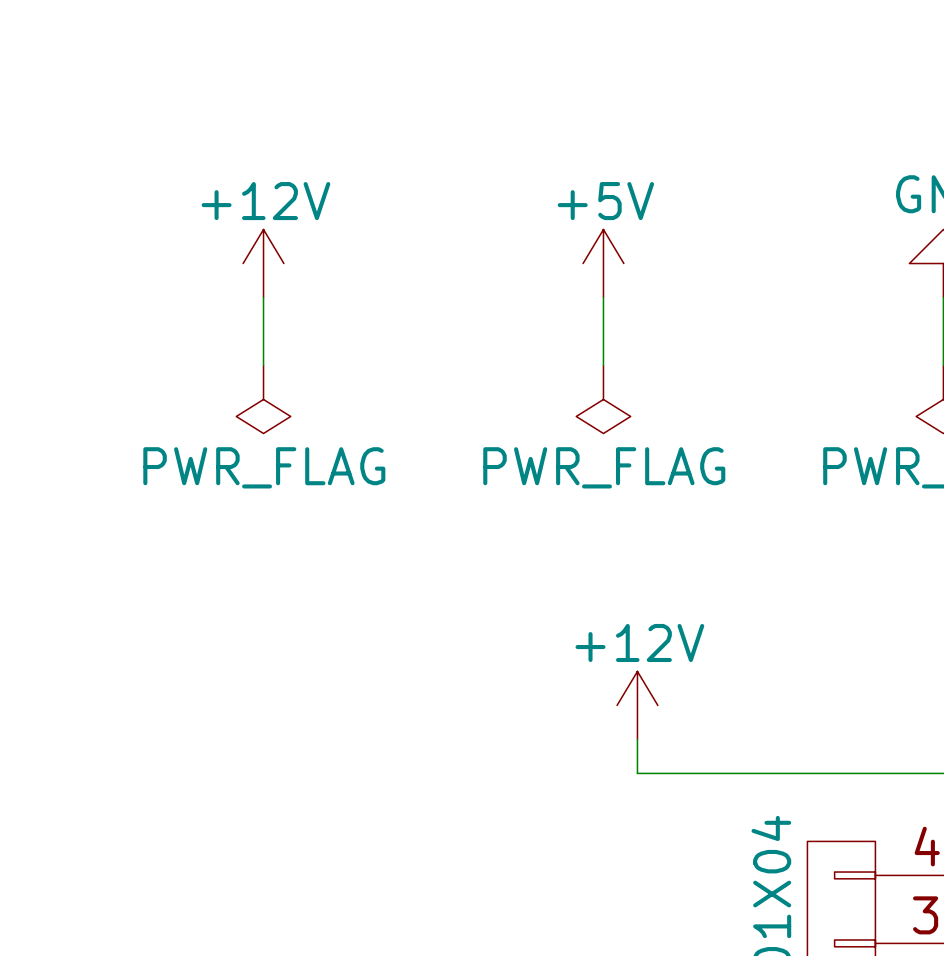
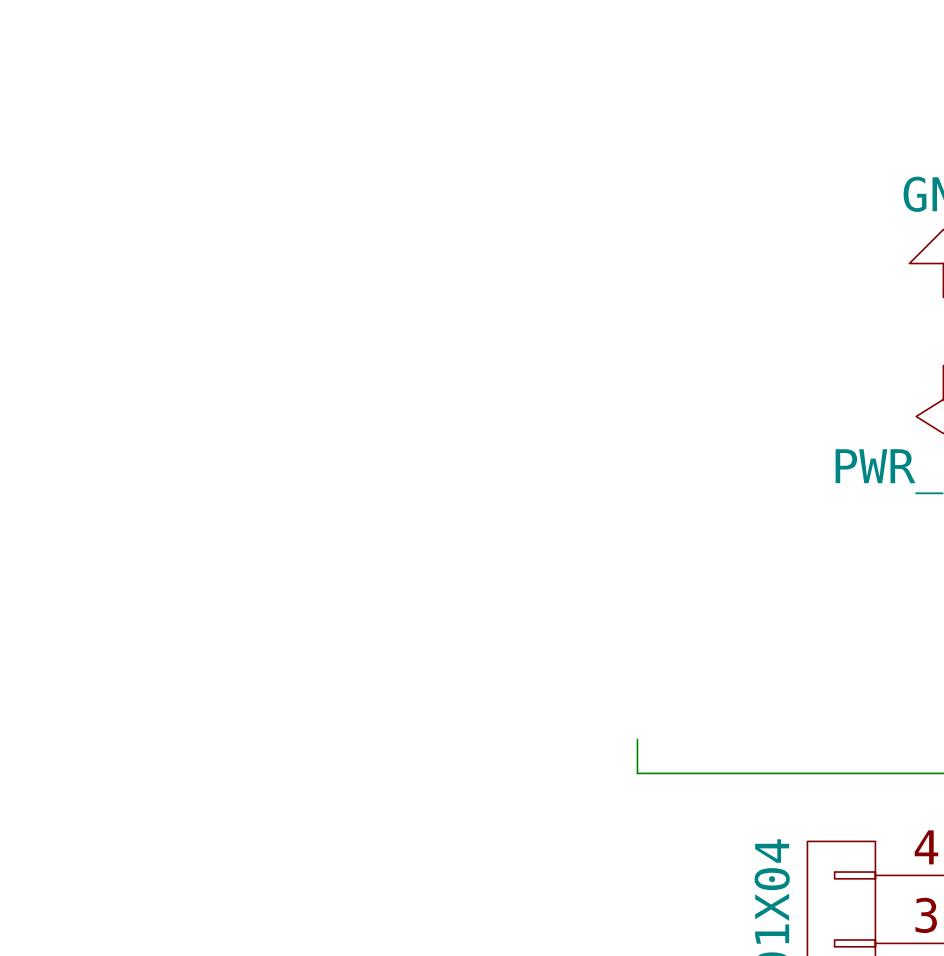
power symbol: +12V (263, 263) -> none
power symbol: +5V (603, 263) -> none
wire: (263, 297) (263, 365) -> none
wire: (603, 297) (603, 365) -> none
wire: (943, 297) (943, 365) -> none
power symbol: PWR_FLAG (263, 399) -> none
power symbol: PWR_FLAG (603, 399) -> none
power symbol: +12V (637, 705) -> none

